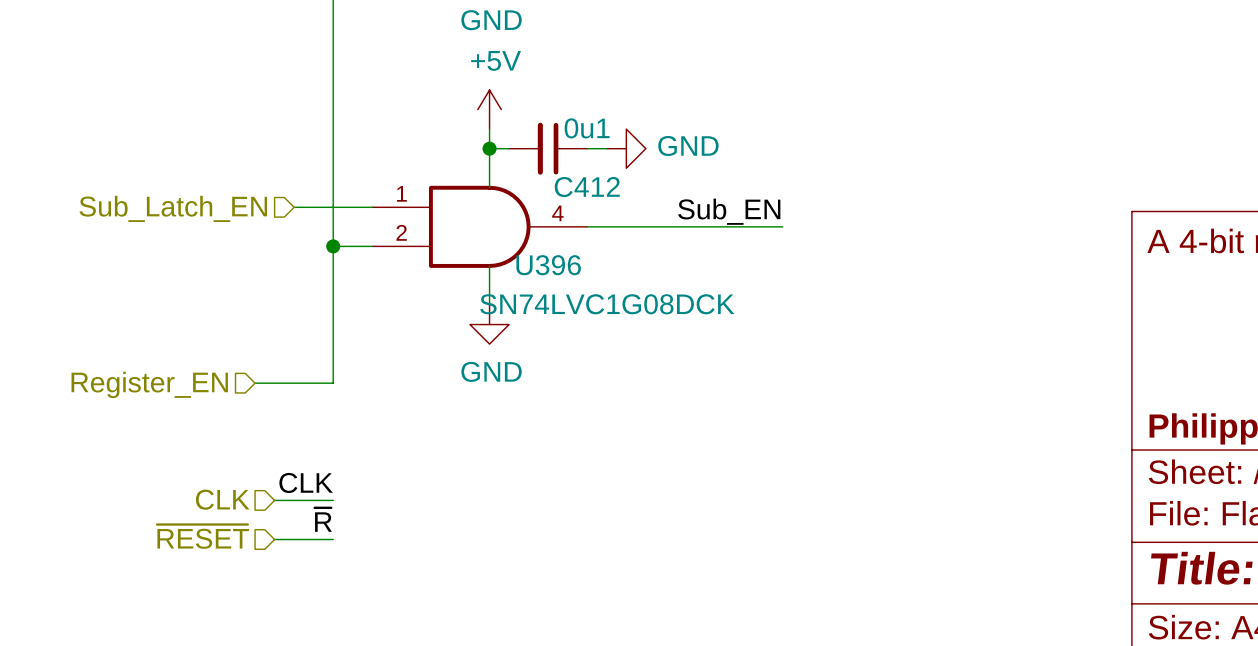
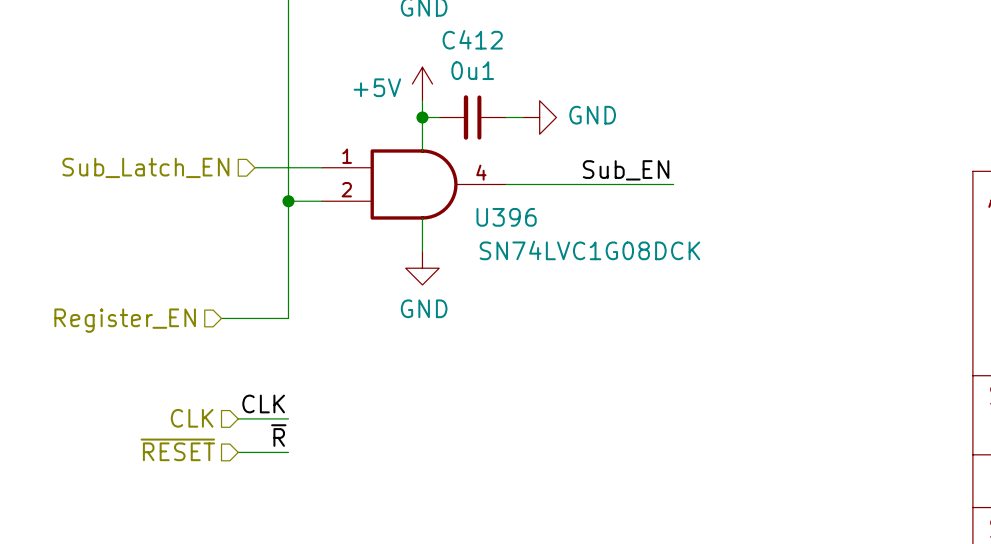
power symbol text position: +5V (496, 60) -> +5V (377, 87)
C412 value position: 0u1 (587, 128) -> 0u1 (472, 70)
C412 name position: C412 (587, 187) -> C412 (472, 39)
U396 name position: U396 (548, 265) -> U396 (506, 217)
U396 value position: SN74LVC1G08DCK (607, 304) -> SN74LVC1G08DCK (589, 250)

